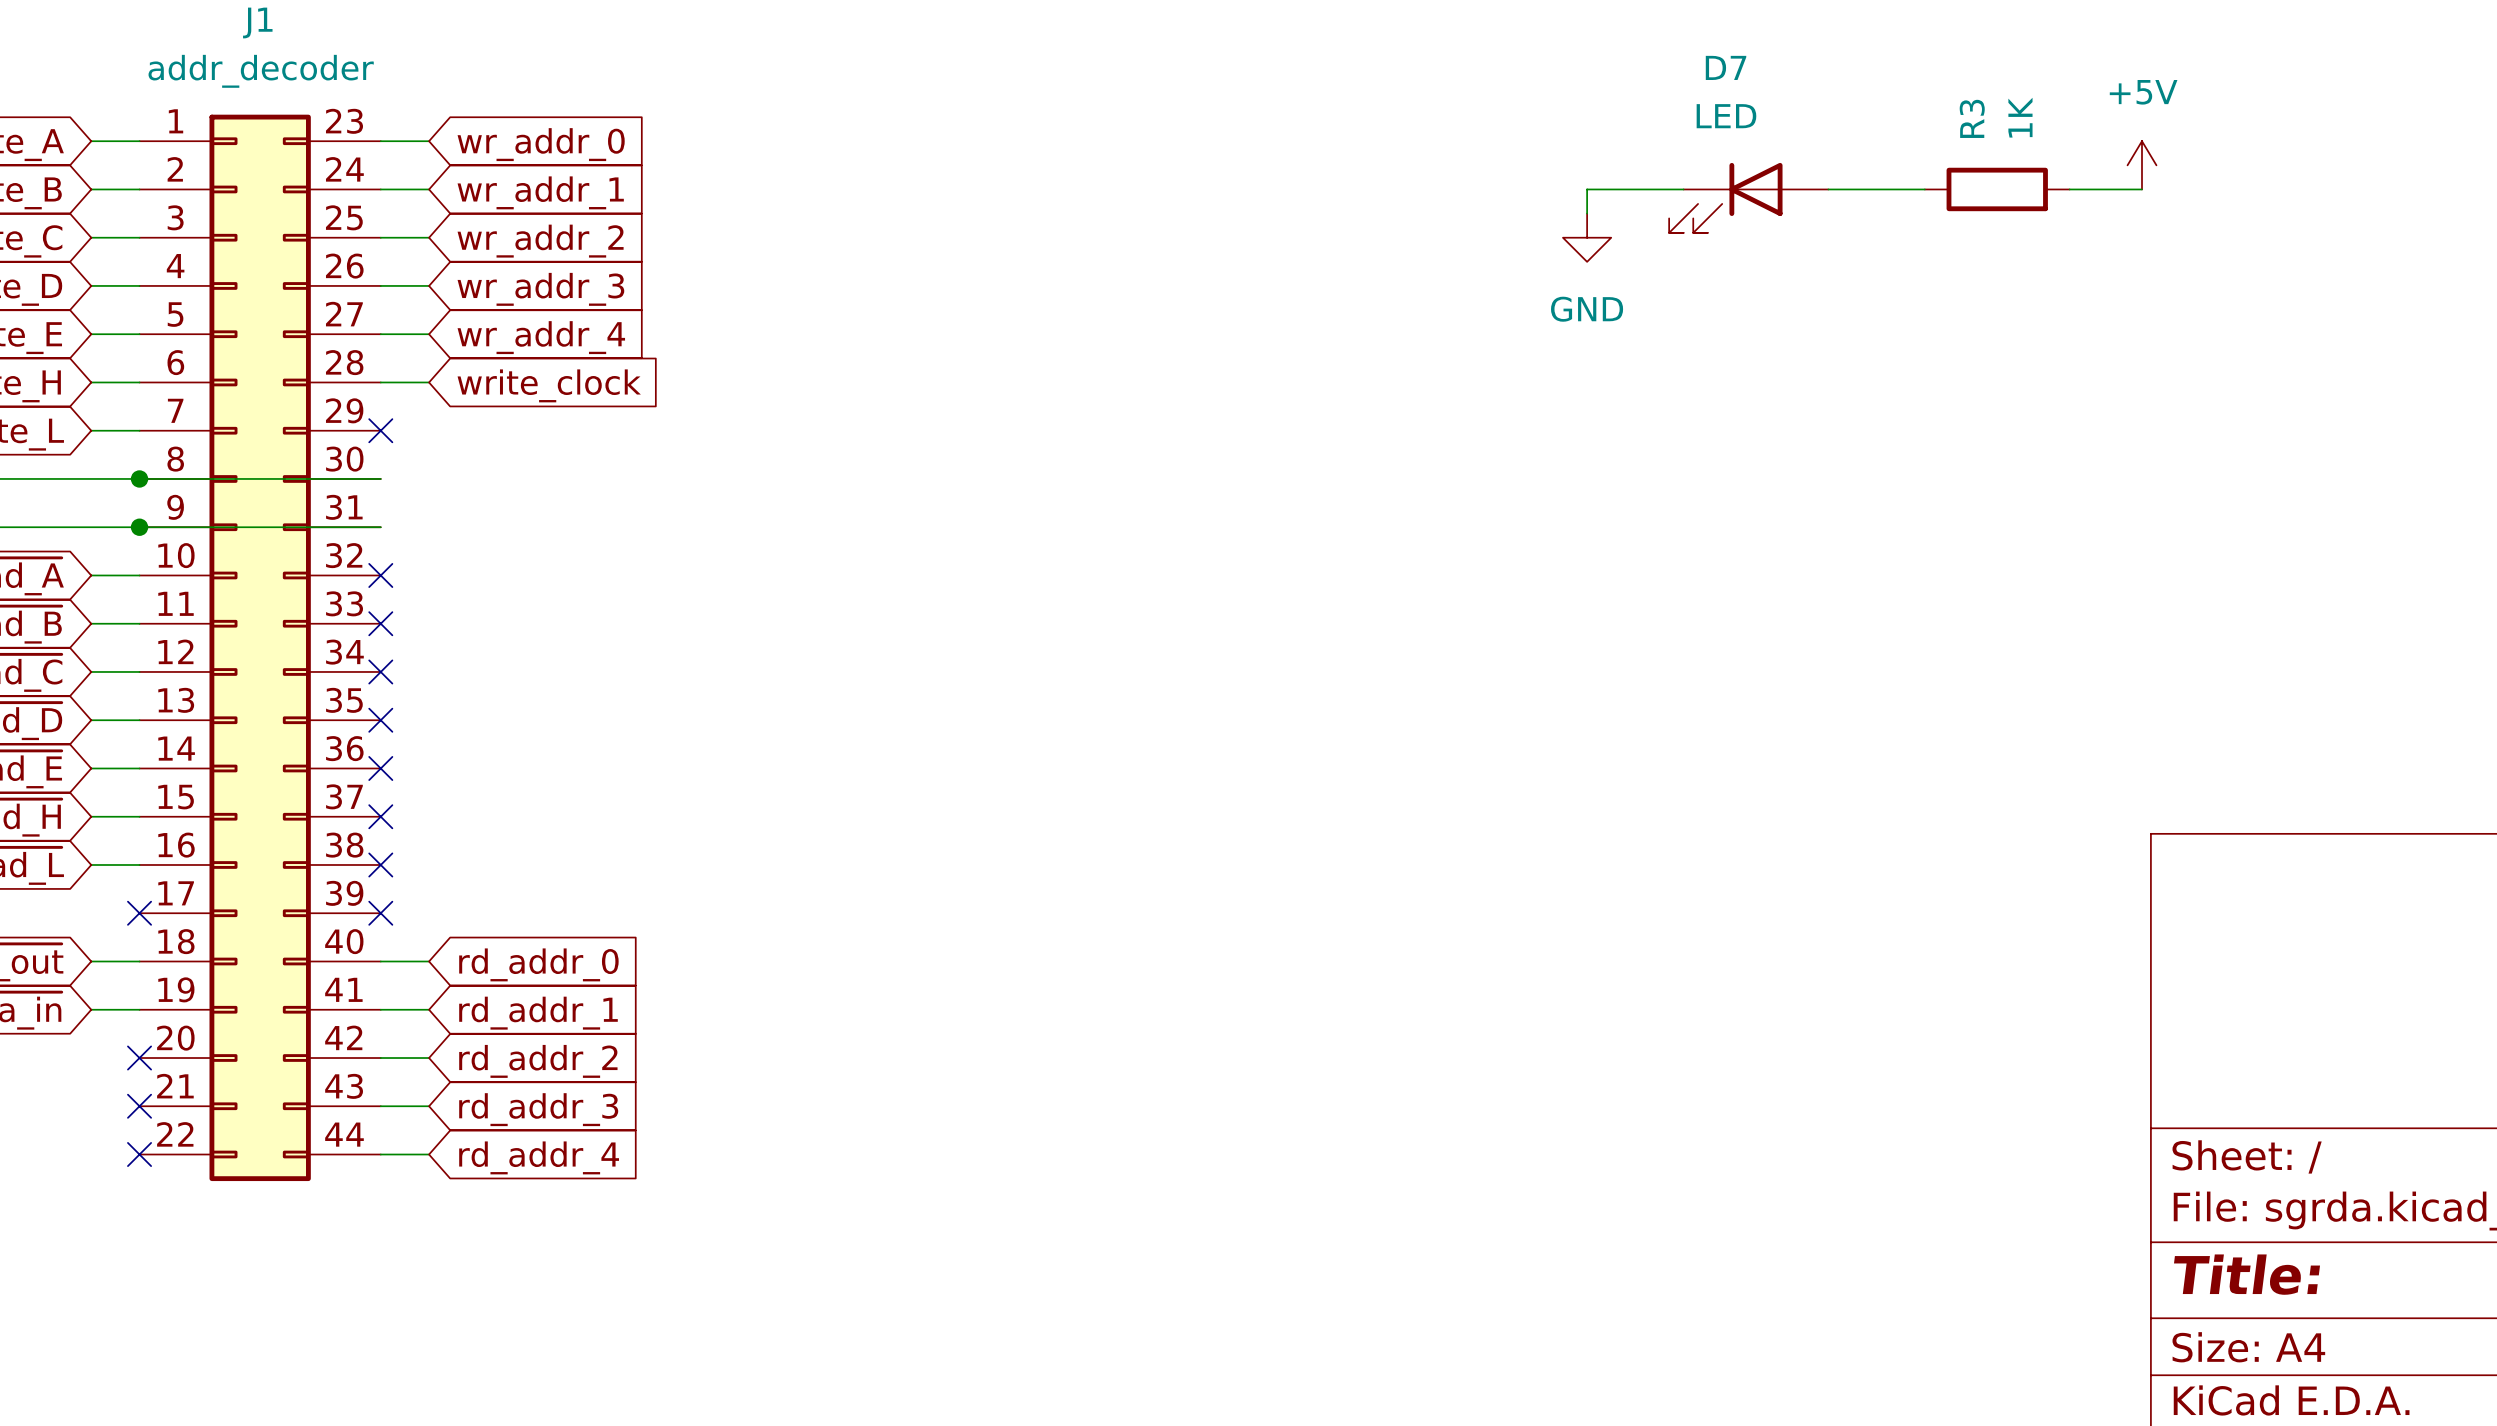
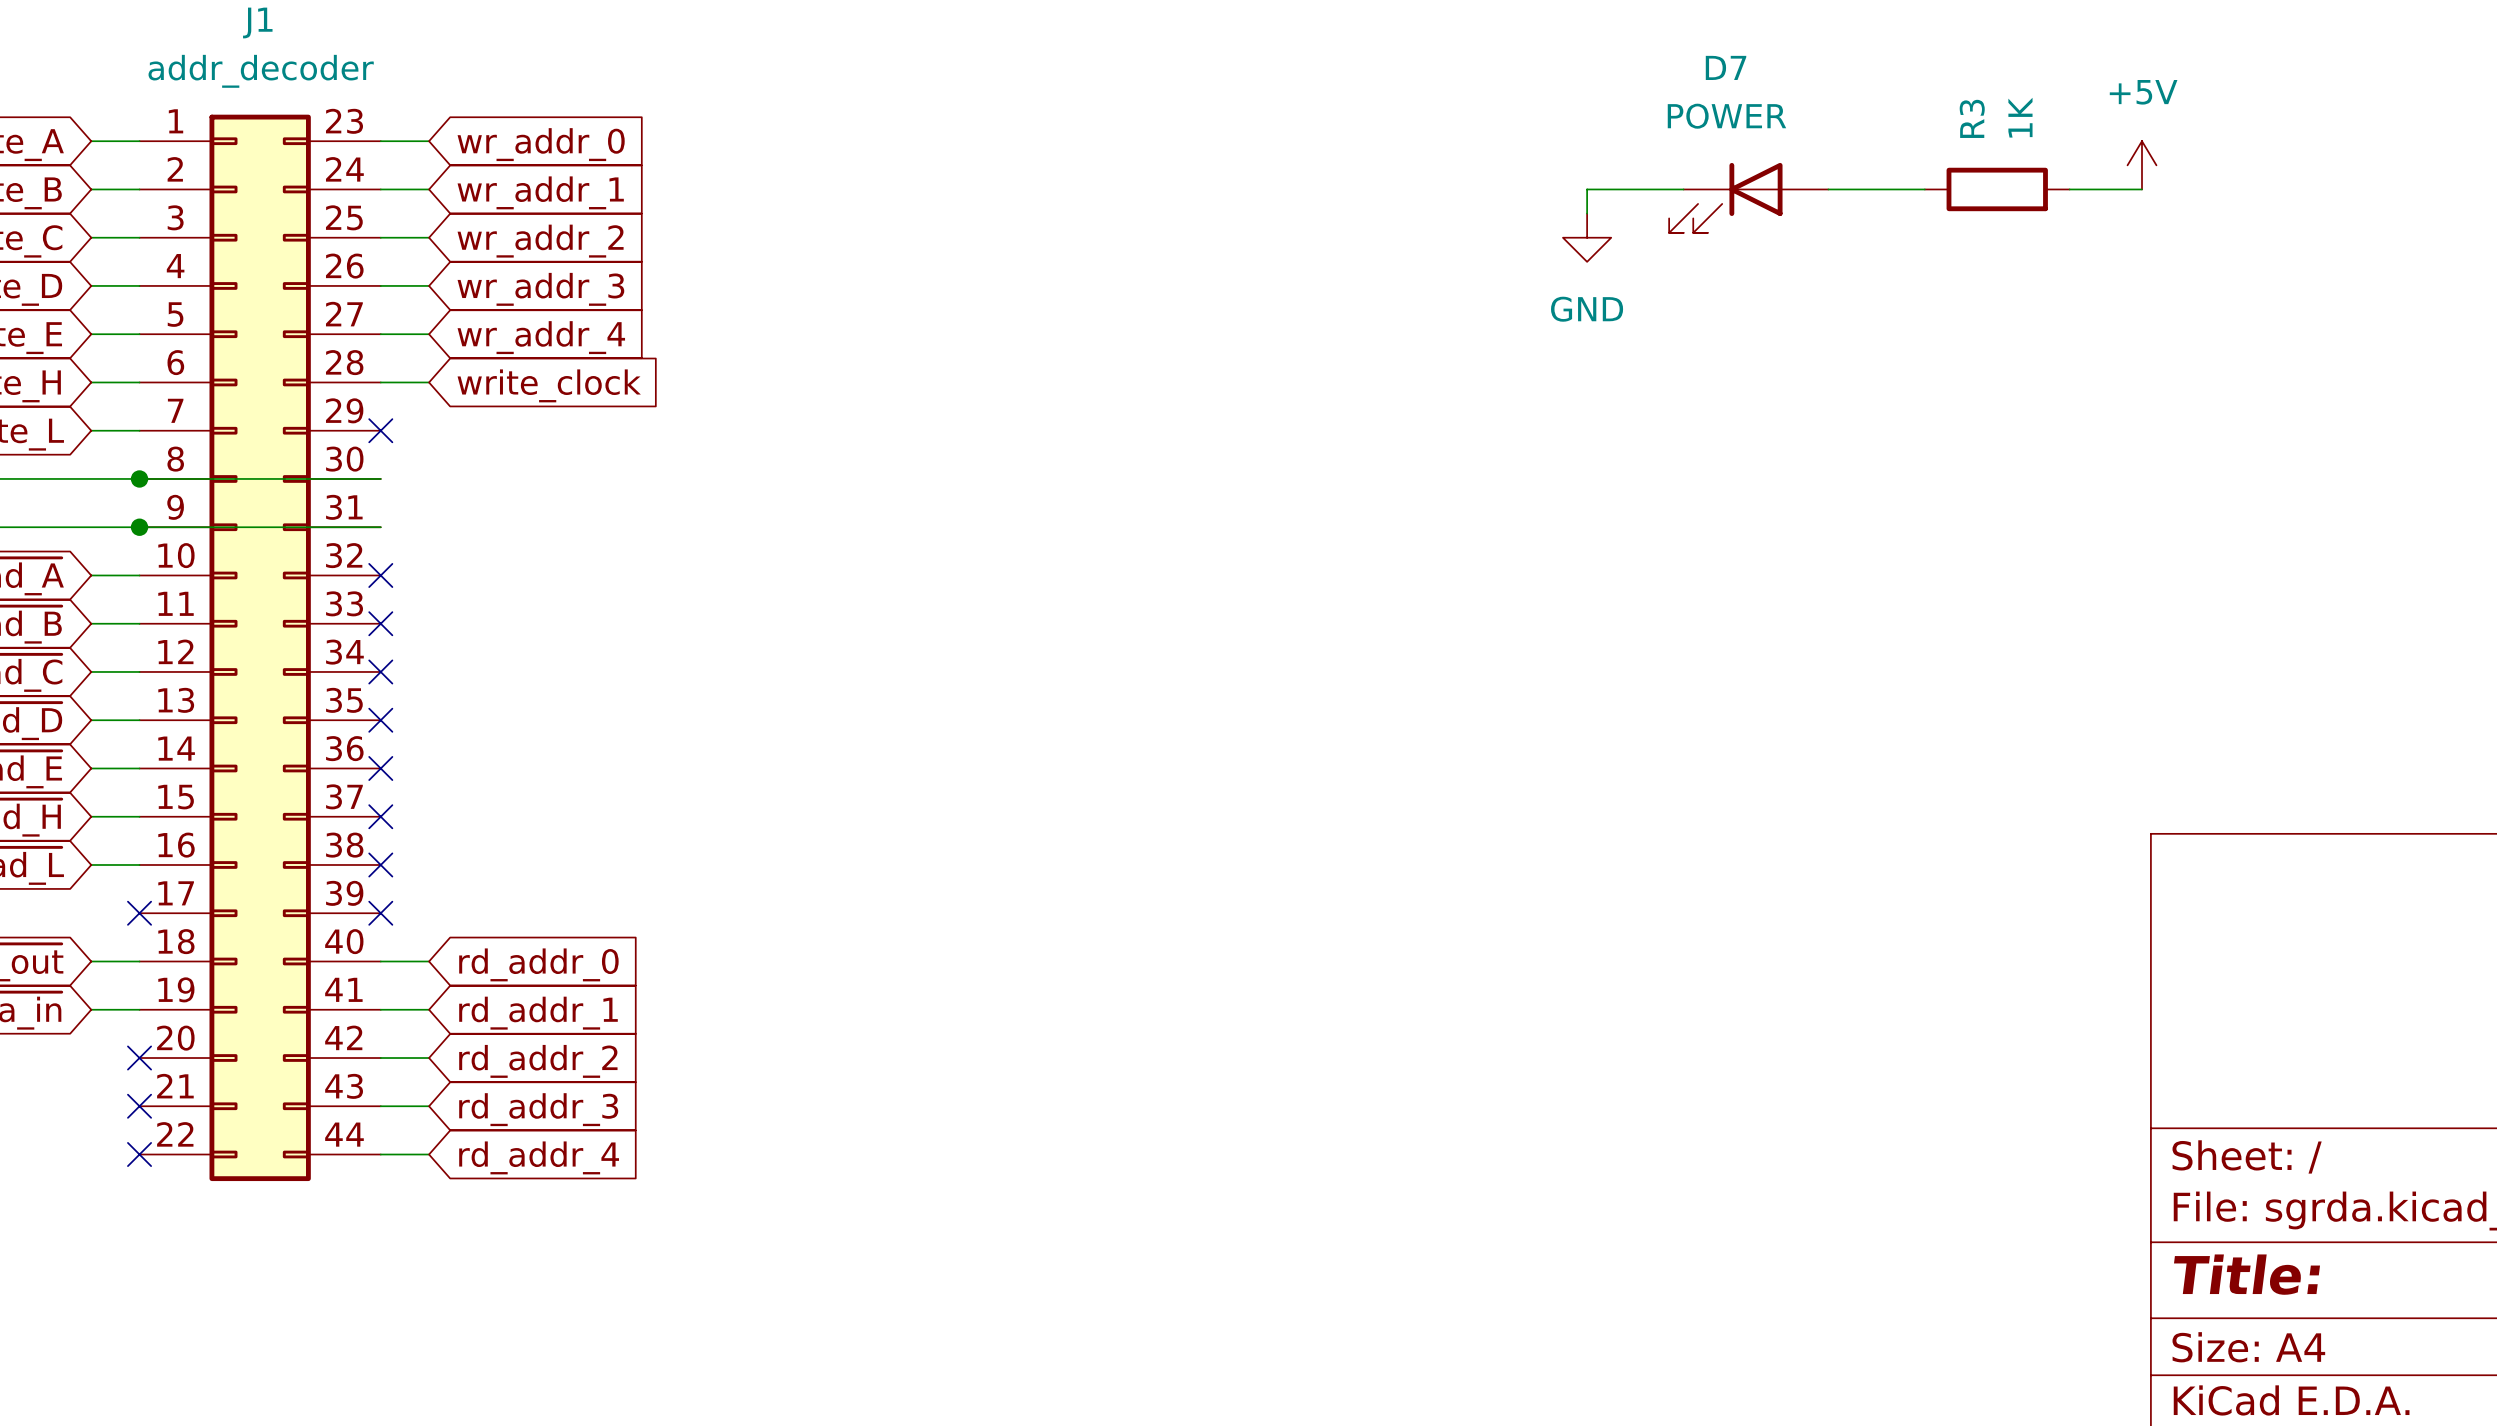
D7 value: LED (1726, 116) -> POWER (1726, 116)

